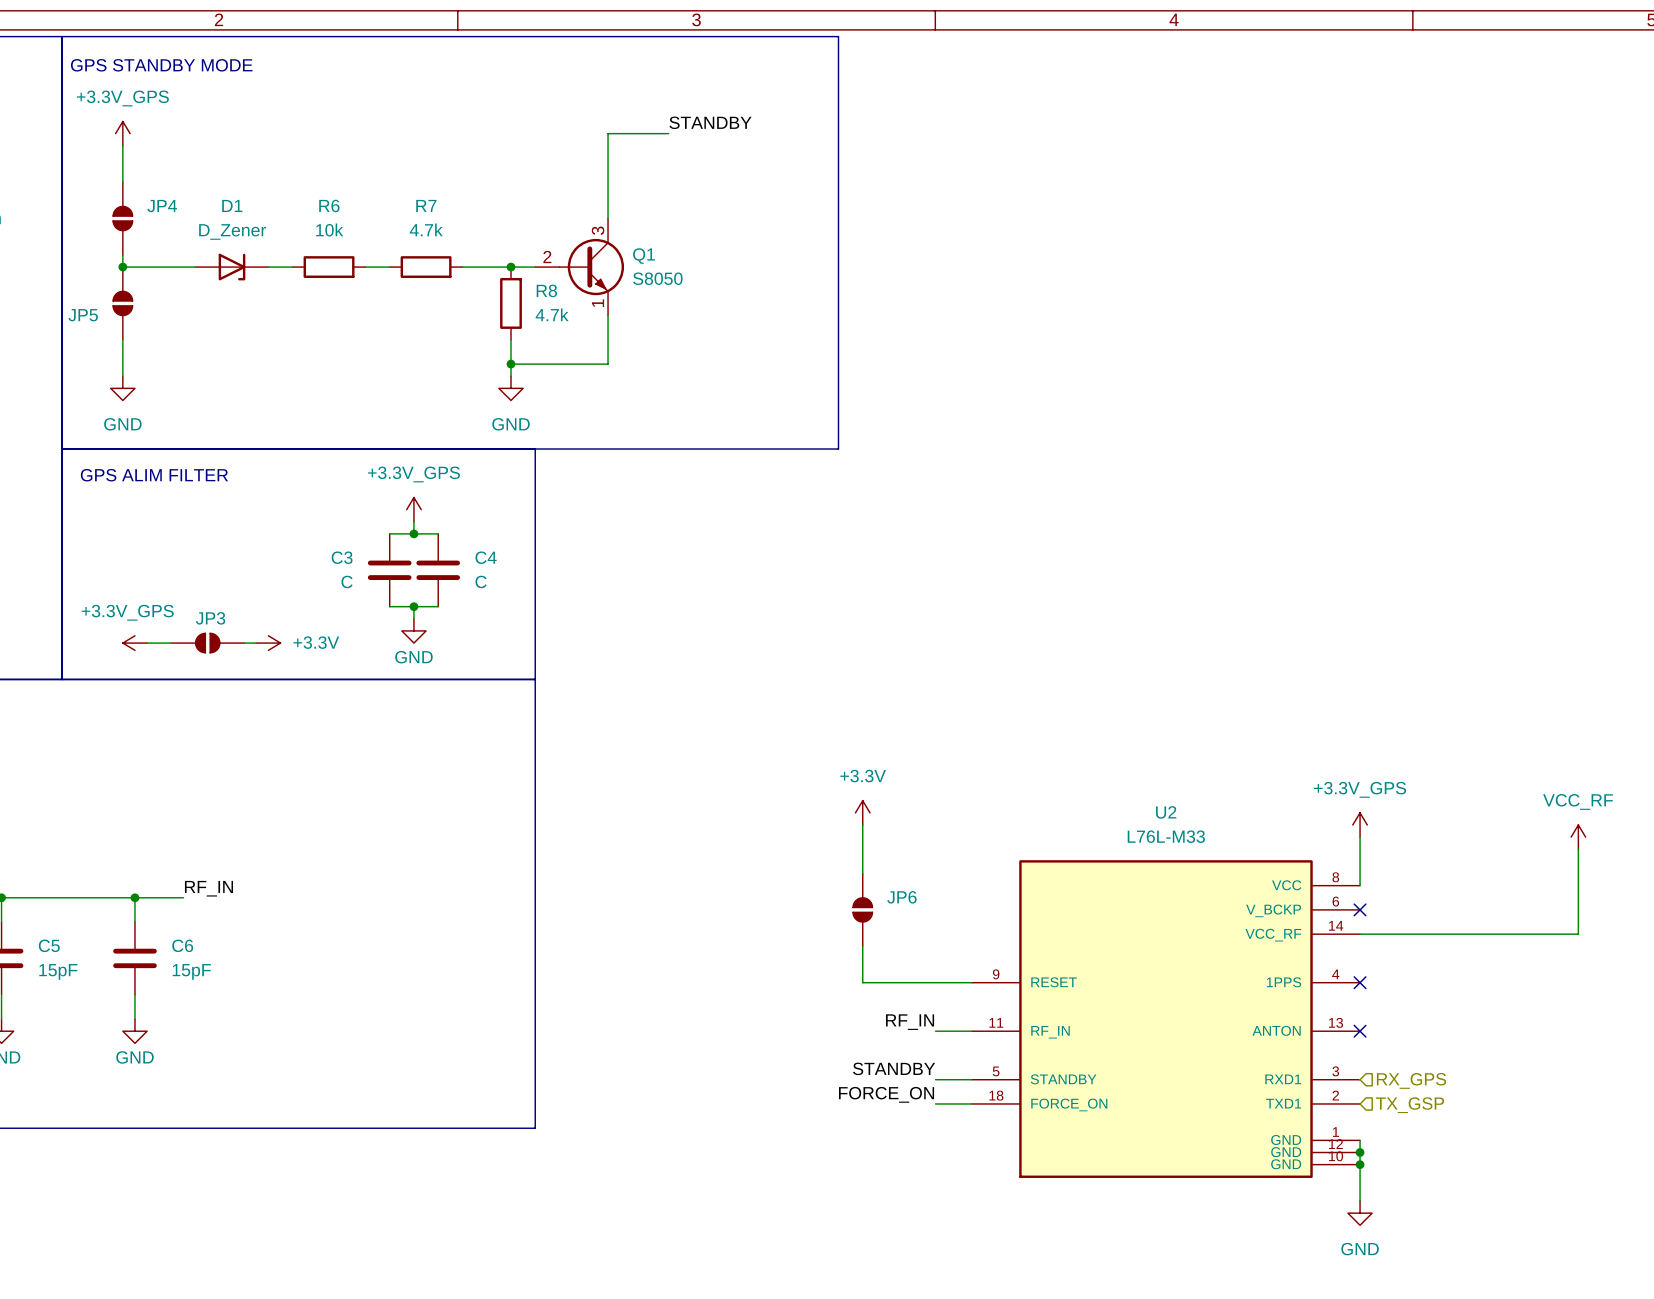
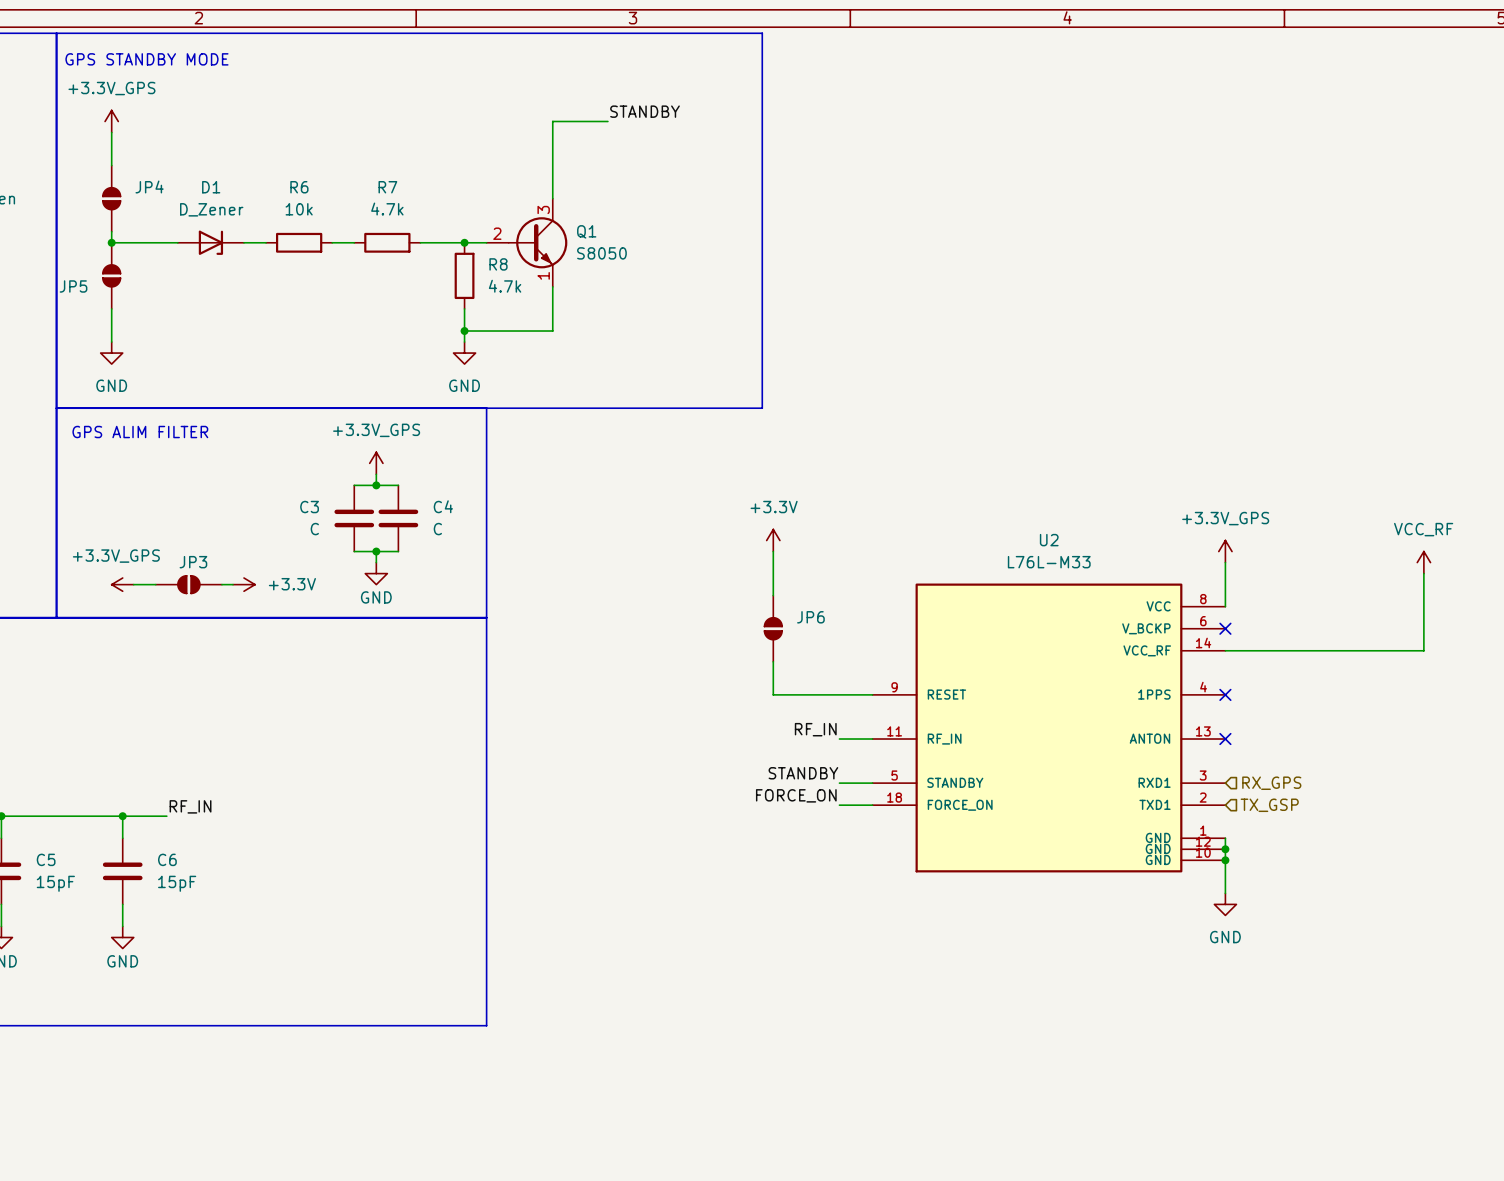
no-connect mark: none -> (1225, 628)
no-connect mark: none -> (1225, 694)
power symbol position: +3.3V (862, 812) -> +3.3V (773, 540)
no-connect mark: none -> (1225, 739)
wire: (862, 825) (862, 873) -> (773, 551) (773, 595)
power symbol position: +3.3V_GPS (1360, 825) -> +3.3V_GPS (1225, 551)
wire: (1360, 837) (1360, 885) -> (1225, 562) (1225, 606)
power symbol position: VCC_RF (1578, 837) -> VCC_RF (1423, 562)
wire: (1578, 849) (1578, 934) (1360, 934) -> (1423, 573) (1423, 650) (1225, 650)
JP6 position: (862, 909) -> (773, 628)
no-connect mark: (1360, 909) -> none
junction: none -> (1225, 849)
wire: (862, 946) (862, 982) (971, 982) -> (773, 661) (773, 694) (872, 694)
junction: none -> (1225, 860)
no-connect mark: (1360, 982) -> none
U2 position: (1165, 1019) -> (1048, 727)
label position: RF_IN (910, 1022) -> RF_IN (815, 729)
wire: (935, 1031) (971, 1031) -> (839, 739) (872, 739)
no-connect mark: (1360, 1031) -> none
label position: STANDBY (894, 1068) -> STANDBY (803, 773)
wire: (935, 1079) (971, 1079) -> (839, 783) (872, 783)
hierarchical label position: RX_GPS (1411, 1080) -> RX_GPS (1271, 783)
label position: FORCE_ON (886, 1094) -> FORCE_ON (796, 795)
wire: (935, 1103) (971, 1103) -> (839, 805) (872, 805)
hierarchical label position: TX_GSP (1409, 1105) -> TX_GSP (1269, 805)
wire: (1360, 1140) (1360, 1201) -> (1225, 838) (1225, 893)
junction: (1360, 1152) -> none
junction: (1360, 1164) -> none
power symbol position: GND (1360, 1213) -> GND (1225, 904)

